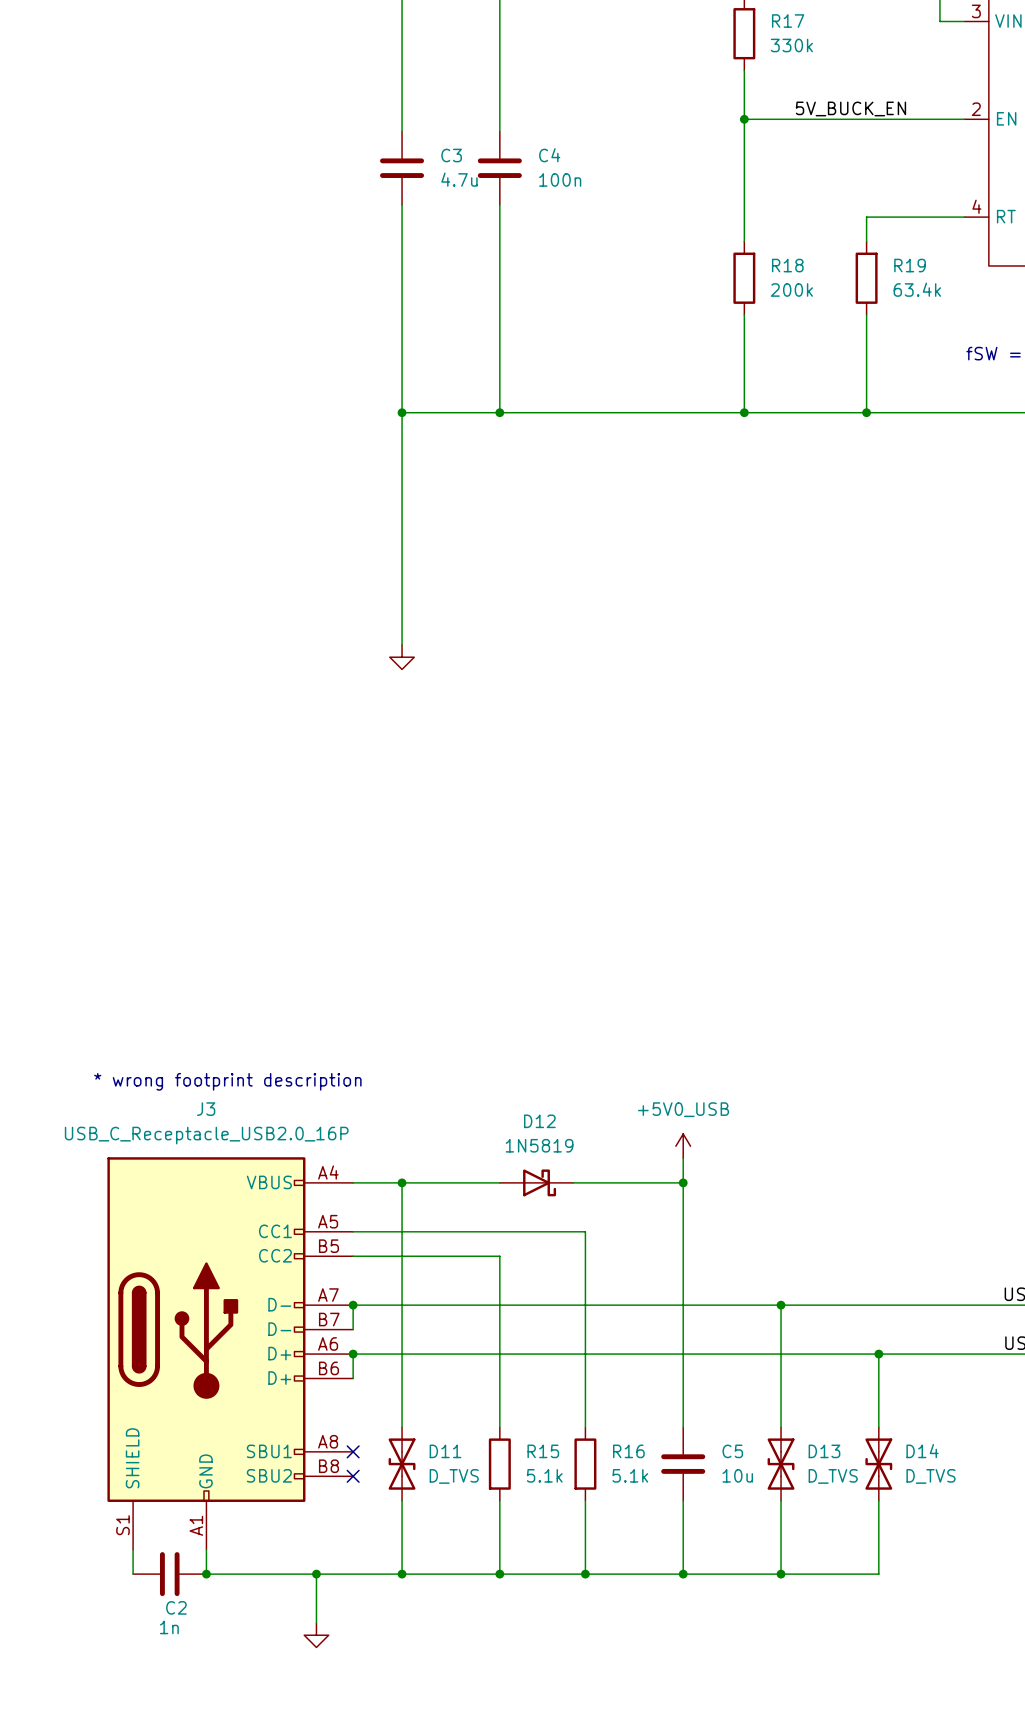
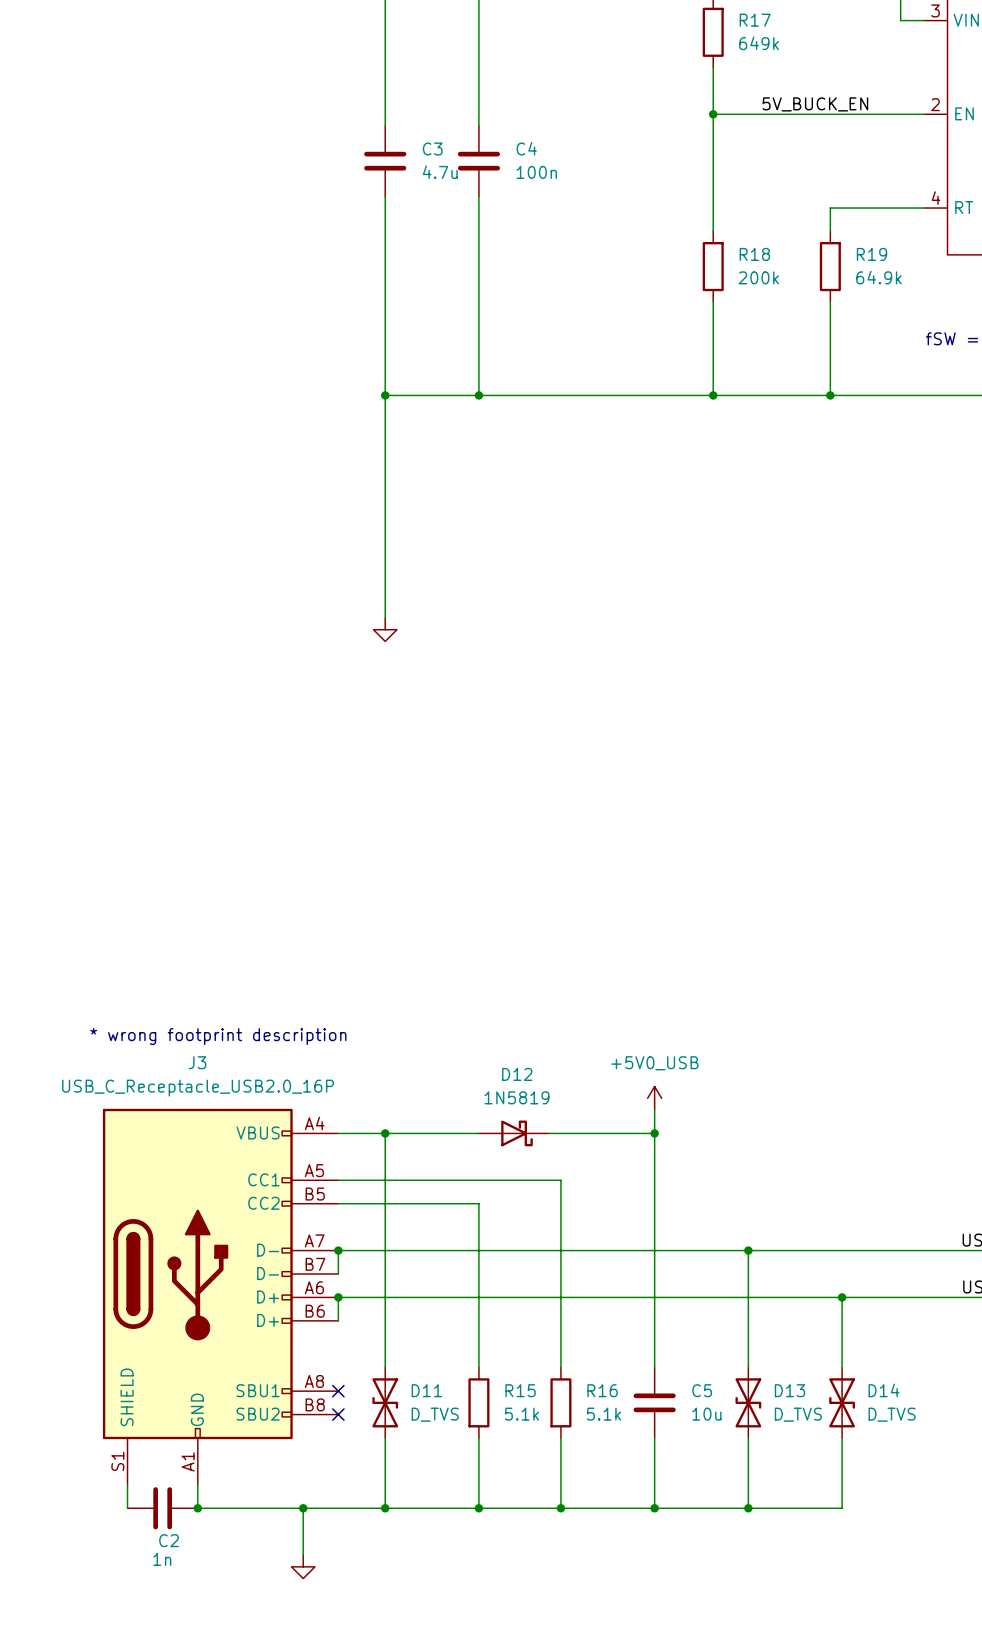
R17 value: 330k (791, 45) -> 649k (759, 43)
R19 value: 63.4k (917, 289) -> 64.9k (878, 277)

